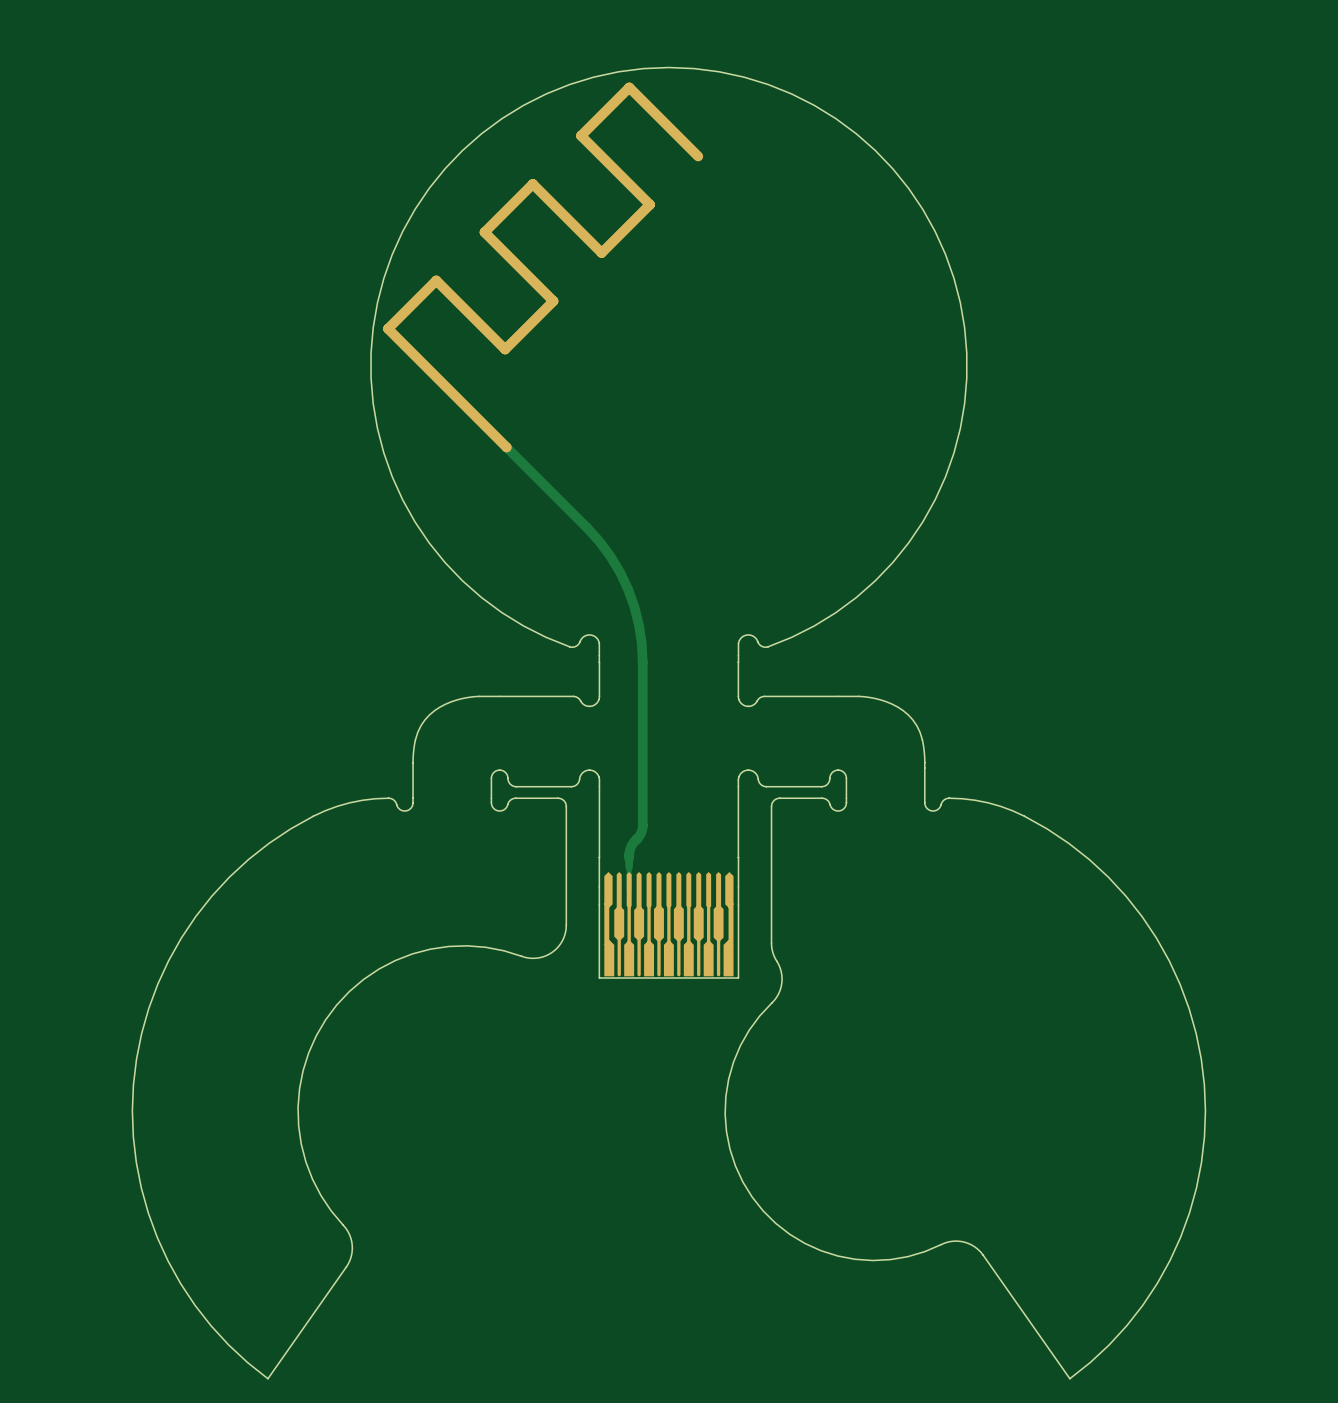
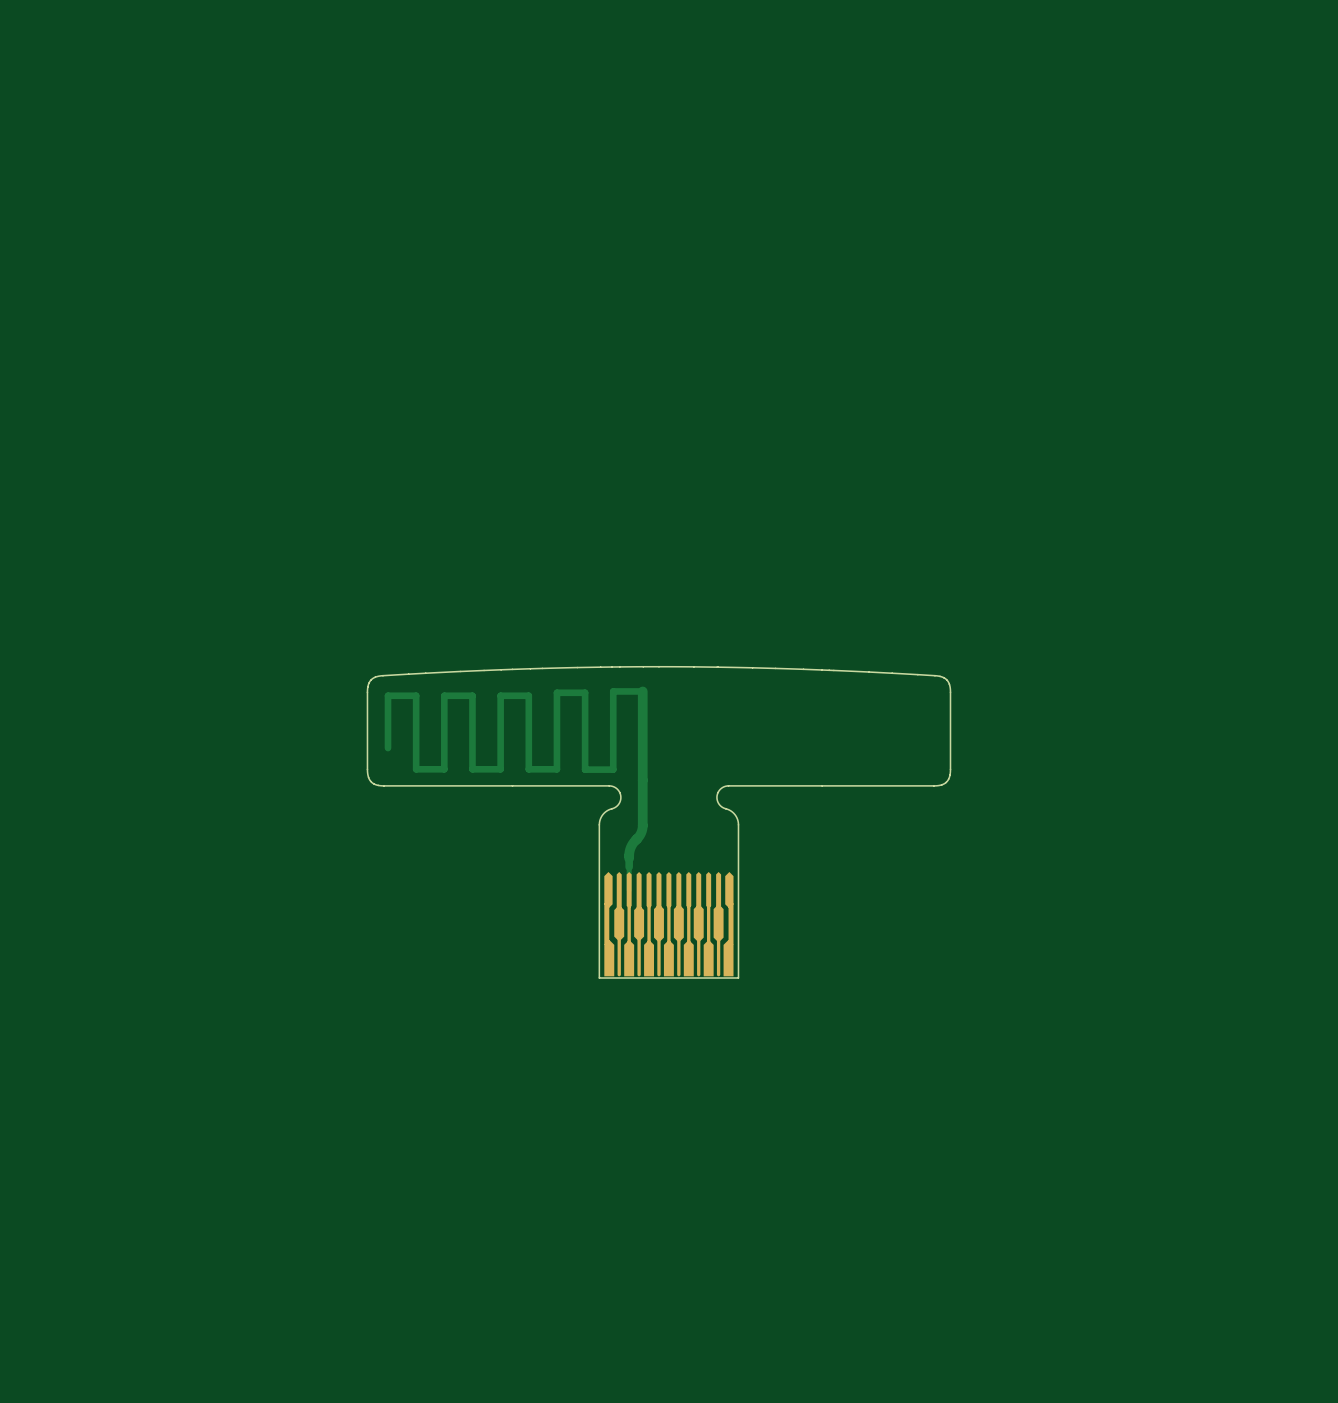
part: (543, 267) -> none
track: (506, 447) (586, 527) (599, 541) (620, 572) (634, 607) (639, 625) (641, 643) (642, 691) -> (388, 748) (388, 695) (416, 695) (416, 769) (444, 769) (444, 695) (472, 695) (472, 769) (500, 769) (500, 695) (528, 695) (528, 769) (556, 769) (556, 692) (585, 692) (585, 769) (613, 769) (613, 691) (642, 691)
board edge: (388, 798) (349, 802) (313, 816) (268, 843) (229, 877) (211, 896) (181, 938) (157, 984) (141, 1033) (136, 1059) (132, 1110) (136, 1162) (148, 1213) (168, 1261) (195, 1305) (228, 1344) (247, 1362) (267, 1378) (346, 1267) (351, 1256) (352, 1245) (349, 1234) (321, 1195) (312, 1179) (305, 1161) (298, 1125) (298, 1107) (303, 1070) (308, 1052) (325, 1019) (336, 1005) (363, 979) (395, 960) (412, 953) (448, 946) (467, 945) (485, 947) (525, 957) (537, 958) (552, 952) (564, 936) (566, 925) (565, 803) (559, 798) (514, 798) (509, 800) (504, 809) (495, 810) (491, 803) (491, 778) (496, 770) (504, 771) (509, 783) (516, 786) (572, 786) (577, 783) (581, 774) (585, 770) (593, 770) (598, 775) (599, 978) -> (717, 667) (577, 667) (458, 671) (380, 675) (372, 678) (368, 683) (367, 771) (369, 779) (374, 784) (609, 785) (618, 790) (620, 796) (619, 803) (604, 813) (599, 823) (599, 978)
board edge: (388, 798) (394, 800) (401, 810) (407, 810) (412, 806) (413, 753) (417, 732) (429, 714) (445, 704) (476, 696) (573, 696) (589, 706) (596, 703) (599, 696) (599, 643) (596, 638) (586, 635) (577, 645) (570, 646) (546, 637) (501, 612) (462, 580) (445, 562) (415, 521) (402, 499) (383, 452) (377, 428) (371, 378) (371, 352) (377, 302) (392, 254) (415, 209) (429, 188) (462, 150) (501, 118) (546, 93) (569, 84) (618, 71) (668, 67) (694, 68) (744, 77) (791, 93) (835, 118) (856, 133) (892, 168) (922, 209) (945, 254) (960, 302) (964, 327) (966, 378) (964, 403) (954, 452) (935, 499) (922, 521) (892, 562) (856, 597) (835, 612) (791, 637) (767, 646) (760, 645) (750, 635) (741, 638) (738, 643) (738, 696) (741, 703) (748, 706) (764, 696) (860, 696) (892, 704) (908, 714) (920, 732) (924, 753) (925, 806) (930, 810) (936, 810) (943, 800) (949, 798) -> none
board edge: (949, 798) (988, 802) (1024, 816) (1068, 843) (1108, 877) (1125, 896) (1156, 938) (1180, 984) (1196, 1033) (1204, 1084) (1204, 1136) (1201, 1162) (1189, 1213) (1169, 1261) (1142, 1305) (1126, 1325) (1090, 1362) (1069, 1378) (983, 1255) (971, 1244) (952, 1241) (907, 1256) (872, 1260) (855, 1259) (820, 1250) (789, 1234) (763, 1210) (742, 1182) (735, 1165) (726, 1131) (725, 1096) (728, 1079) (740, 1045) (759, 1016) (776, 997) (781, 983) (781, 971) (771, 946) (771, 804) (773, 800) (778, 798) (822, 798) (827, 800) (833, 809) (841, 810) (846, 803) (846, 778) (841, 770) (833, 771) (828, 783) (821, 786) (765, 786) (760, 783) (756, 774) (751, 770) (744, 770) (739, 775) (738, 978) -> (718, 667) (936, 675) (946, 679) (950, 689) (950, 772) (948, 779) (943, 784) (728, 785) (719, 790) (716, 796) (718, 803) (733, 813) (738, 823) (738, 978)

